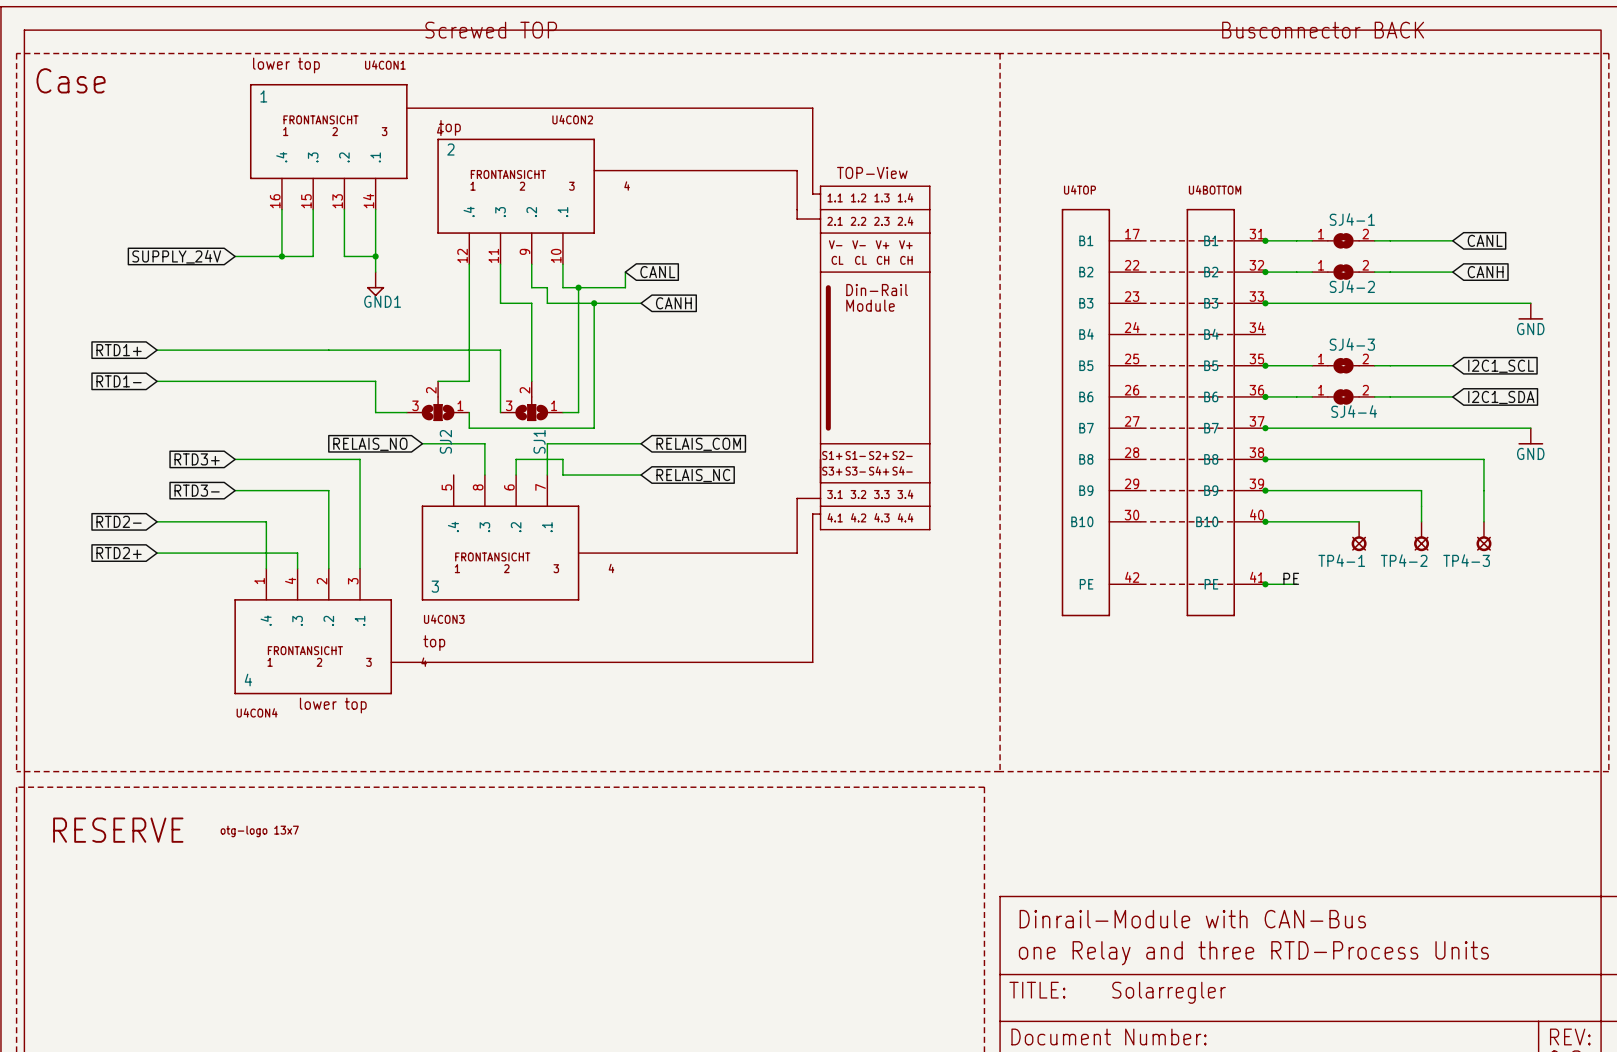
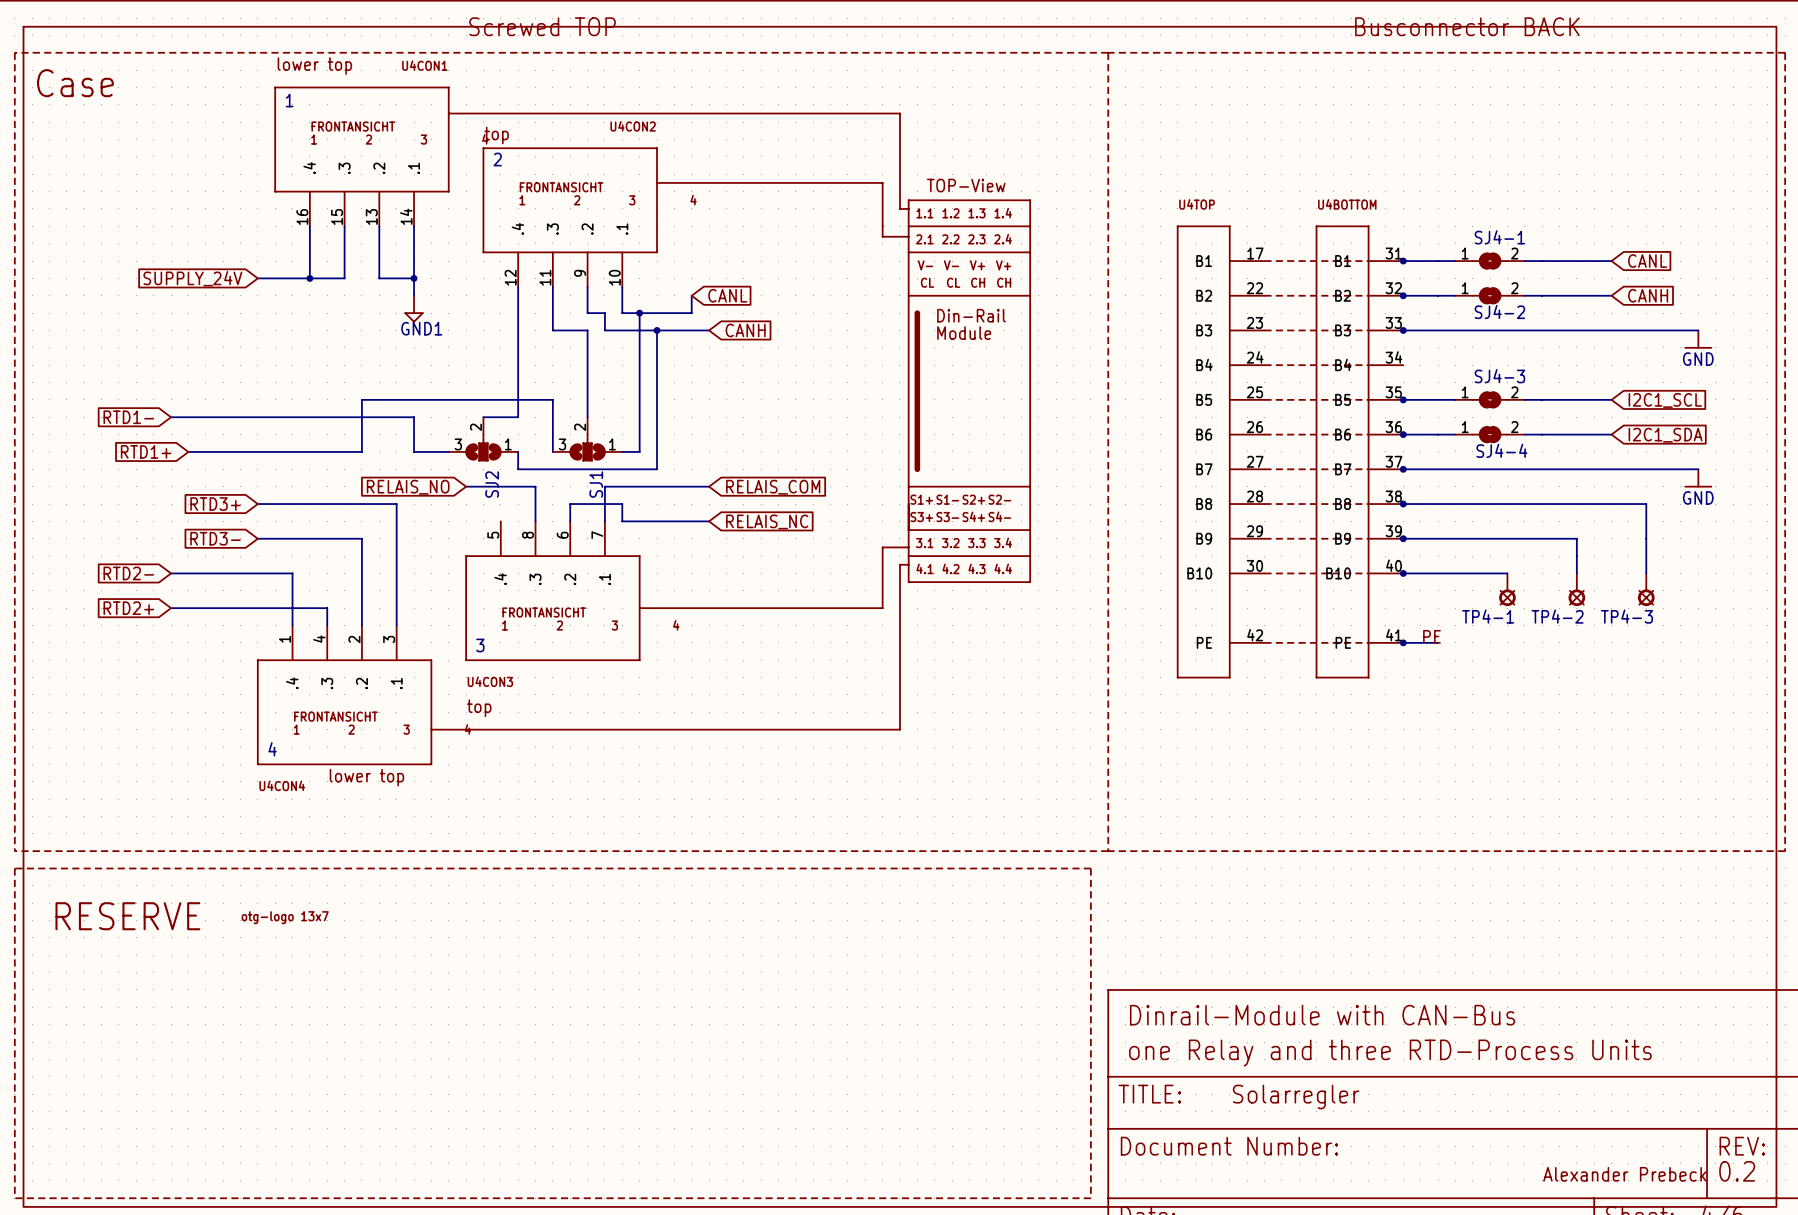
global label position: RTD1+ (119, 350) -> RTD1+ (146, 451)
wire: (157, 350) (500, 350) (500, 365) -> (188, 451) (361, 451) (361, 399) (552, 399)

